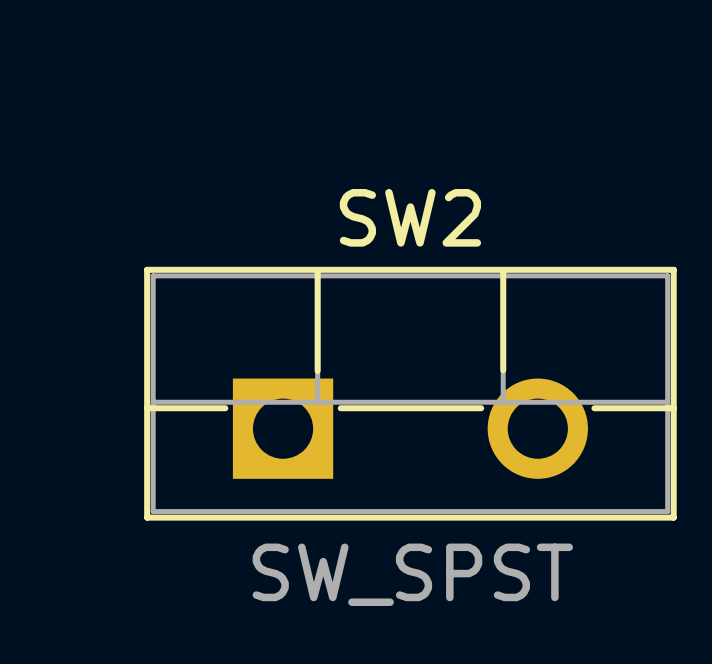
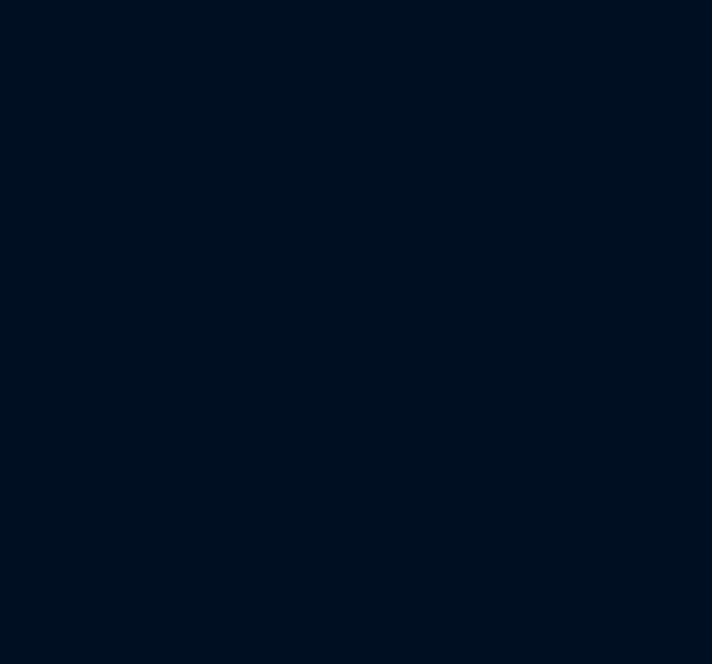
SW2: SW_SPST (410, 393) -> none

